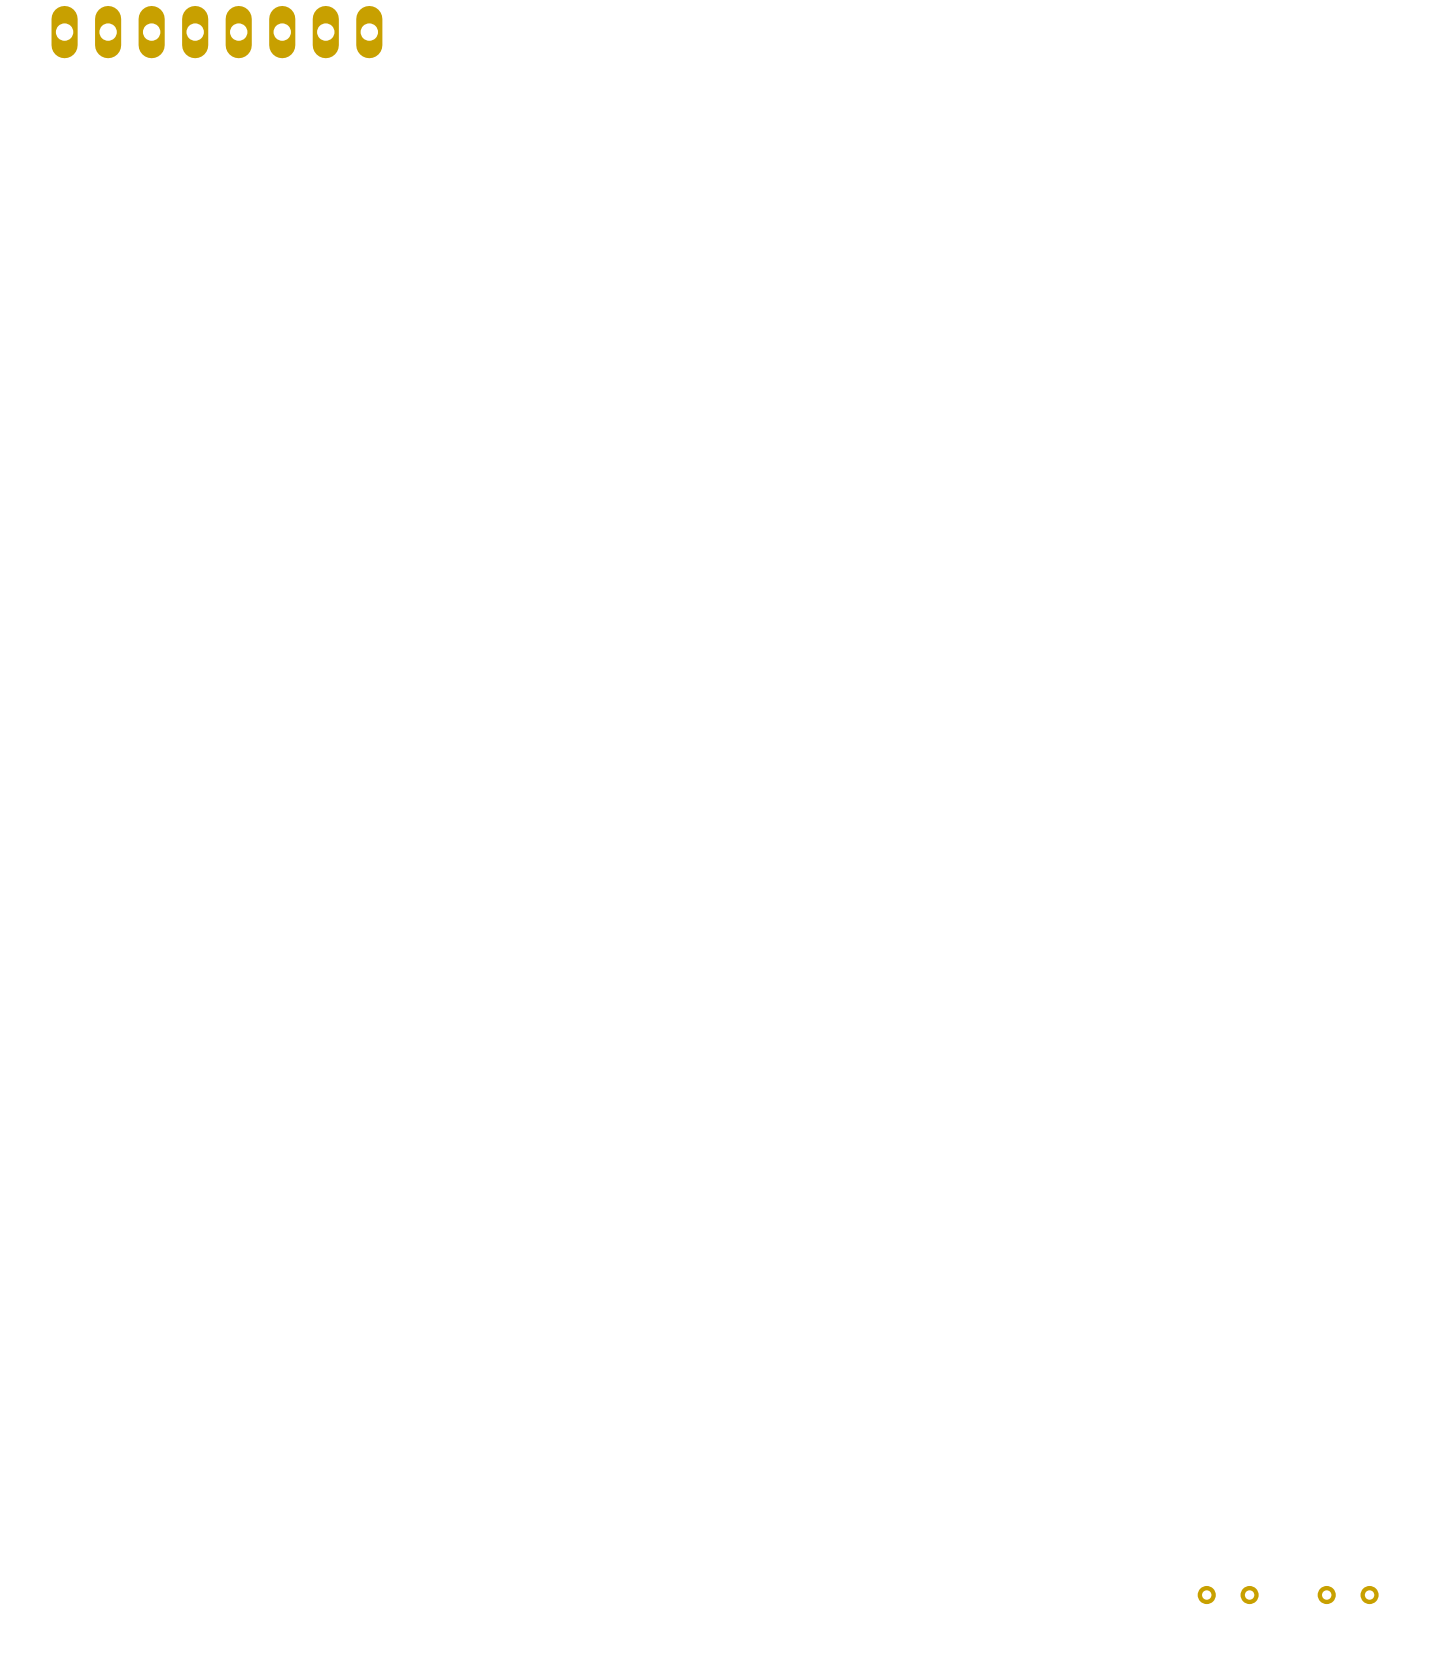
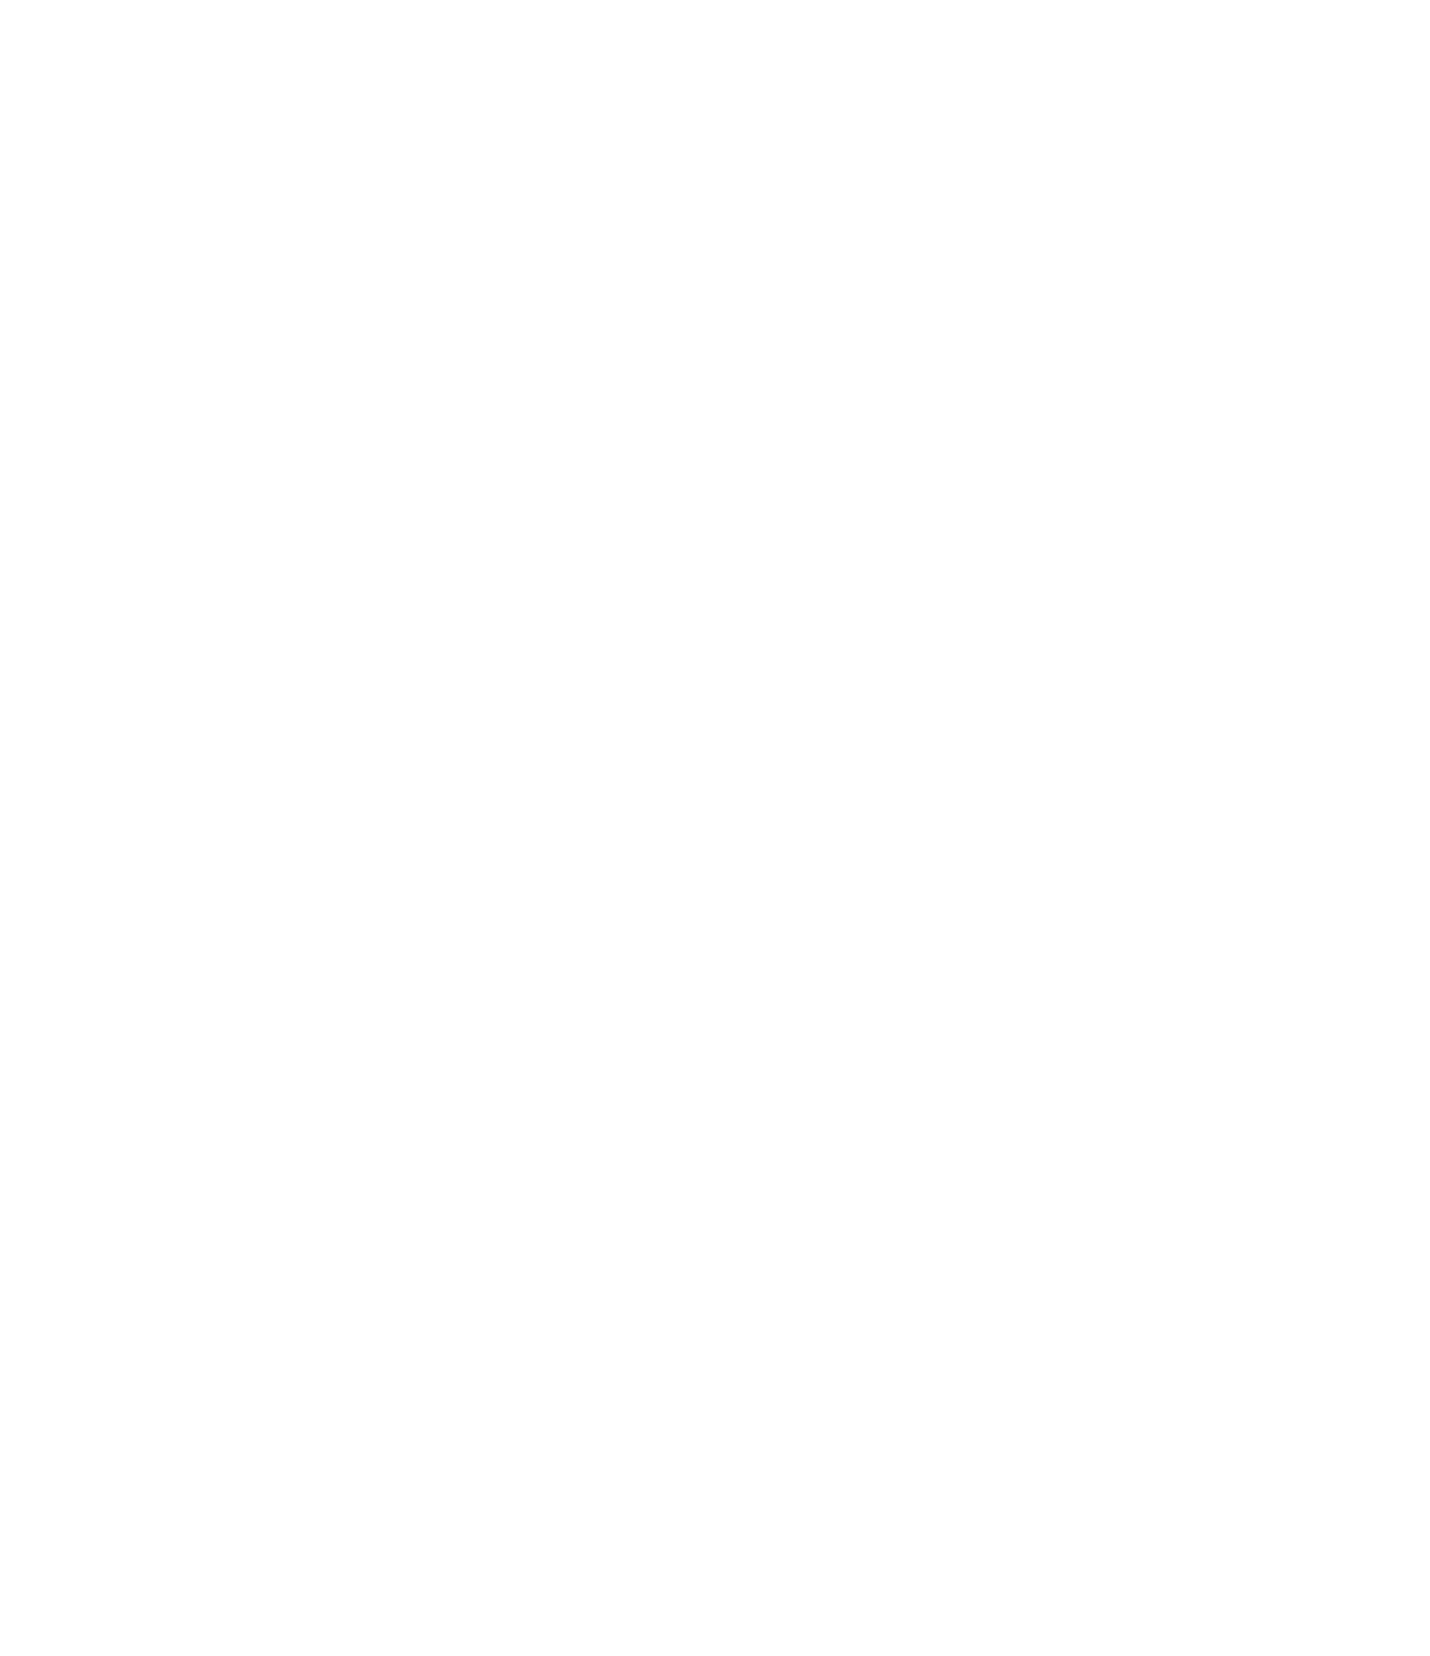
part: (216, 32) -> none
part: (1228, 1595) -> none
part: (1348, 1595) -> none

